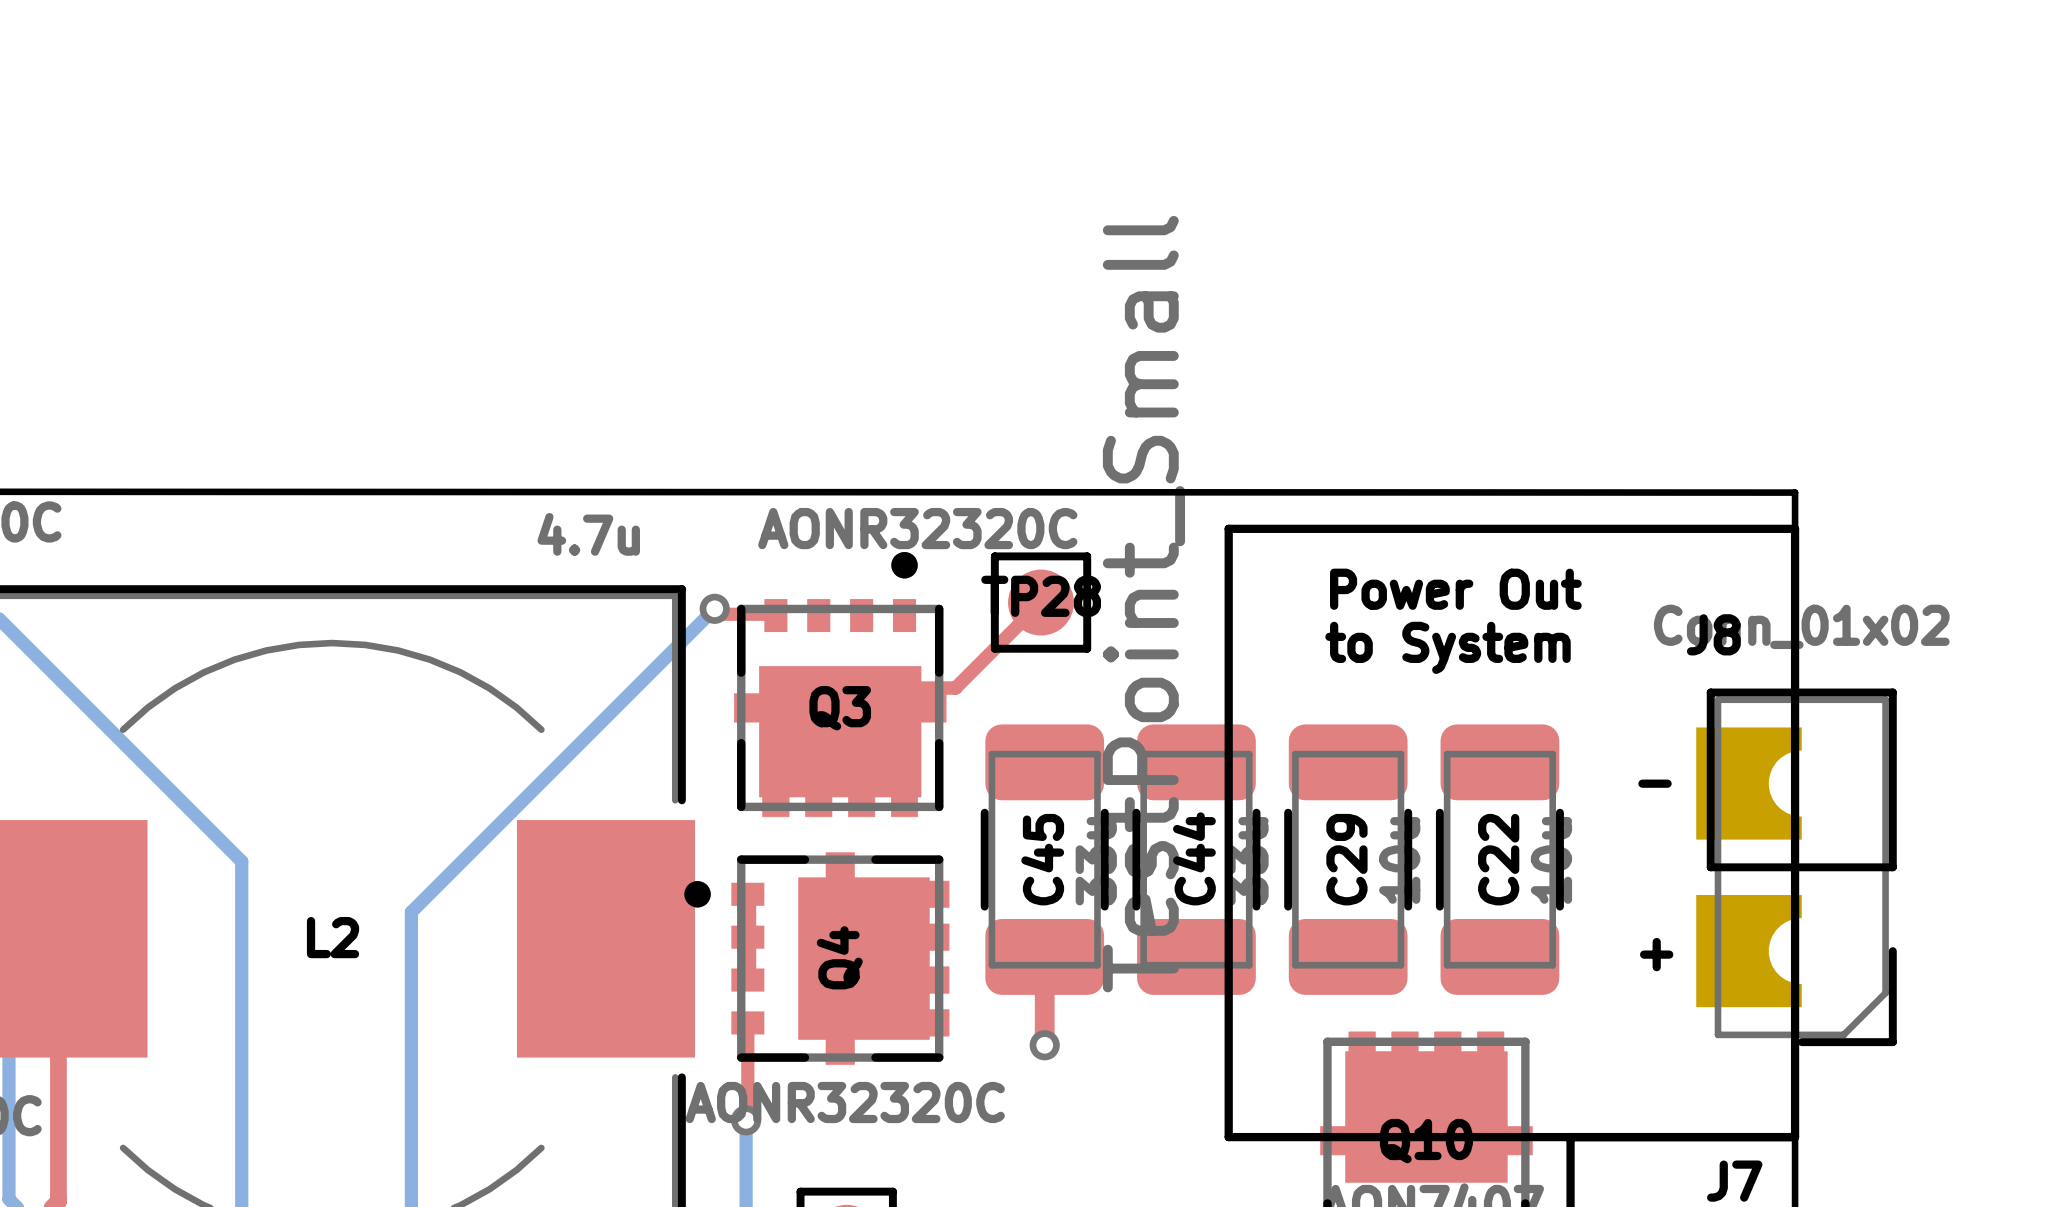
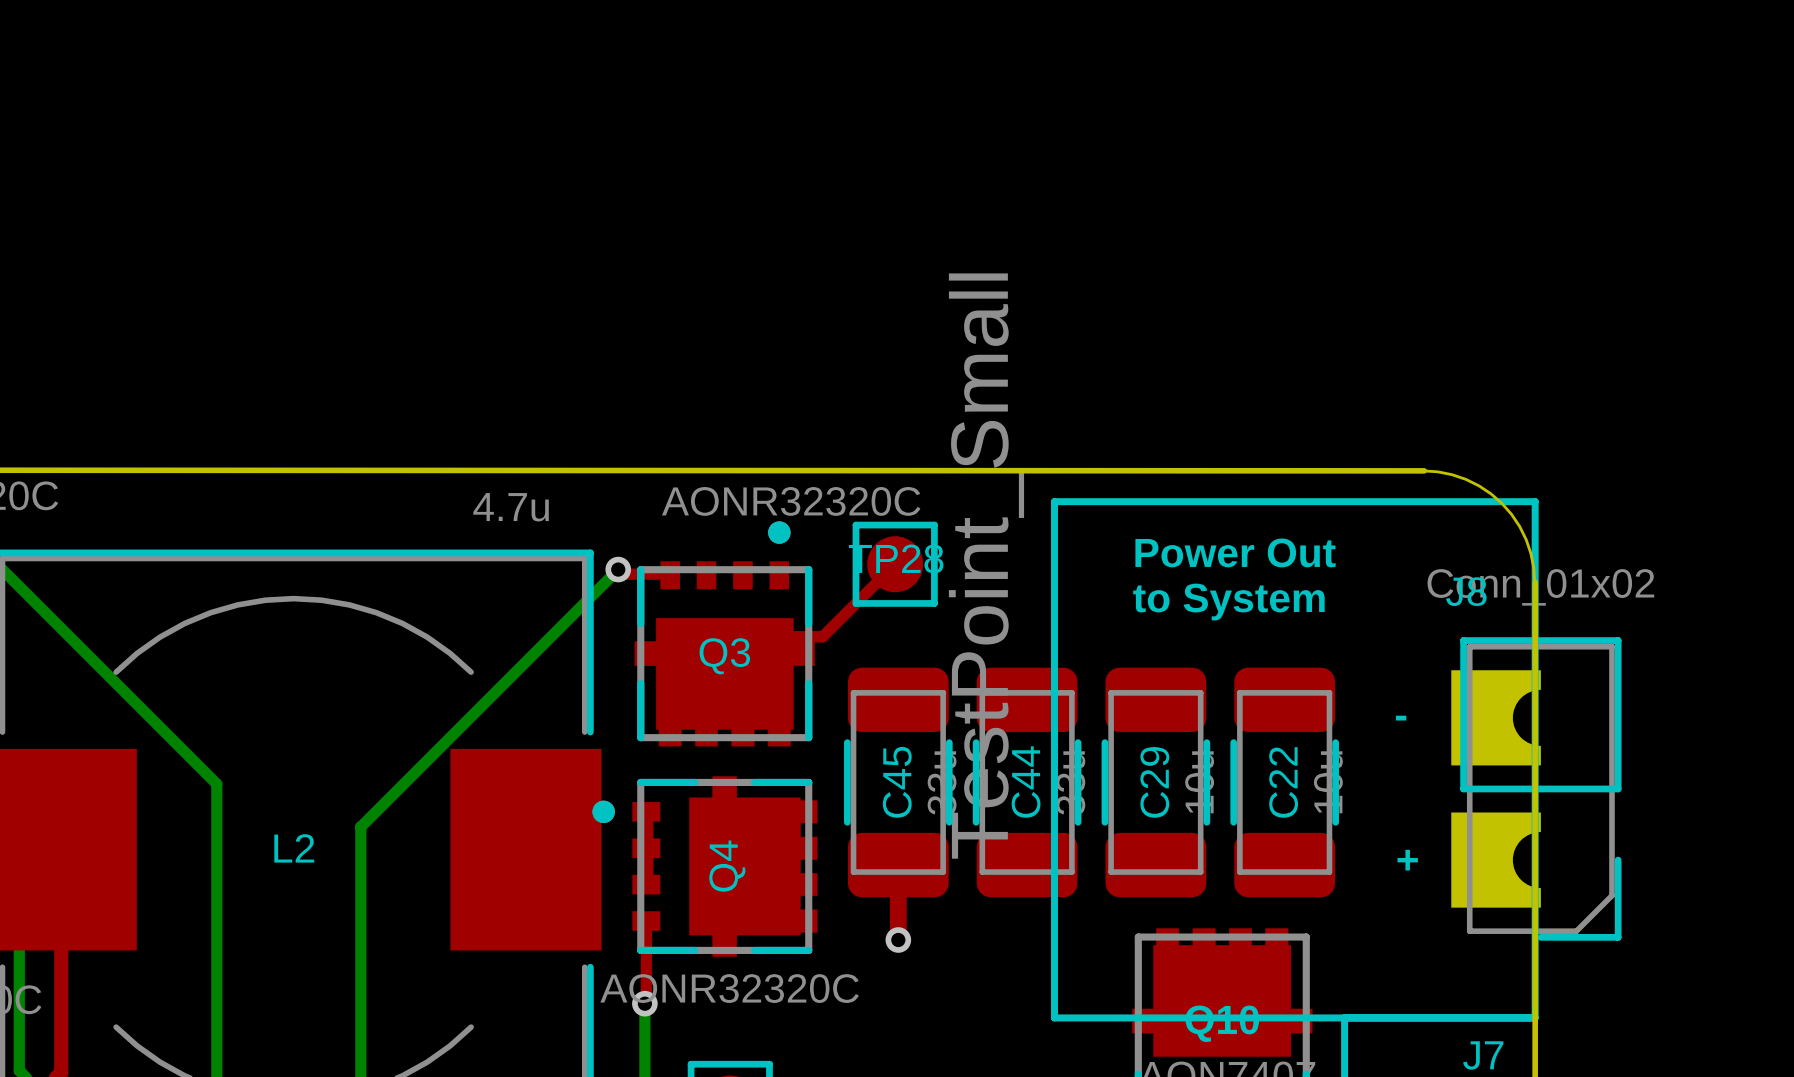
board edge: (1664, 492) (1795, 492) (1795, 623) -> (1423, 470) (1437, 471) (1465, 479) (1491, 493) (1502, 503) (1519, 526) (1526, 539) (1533, 567) (1534, 582)

